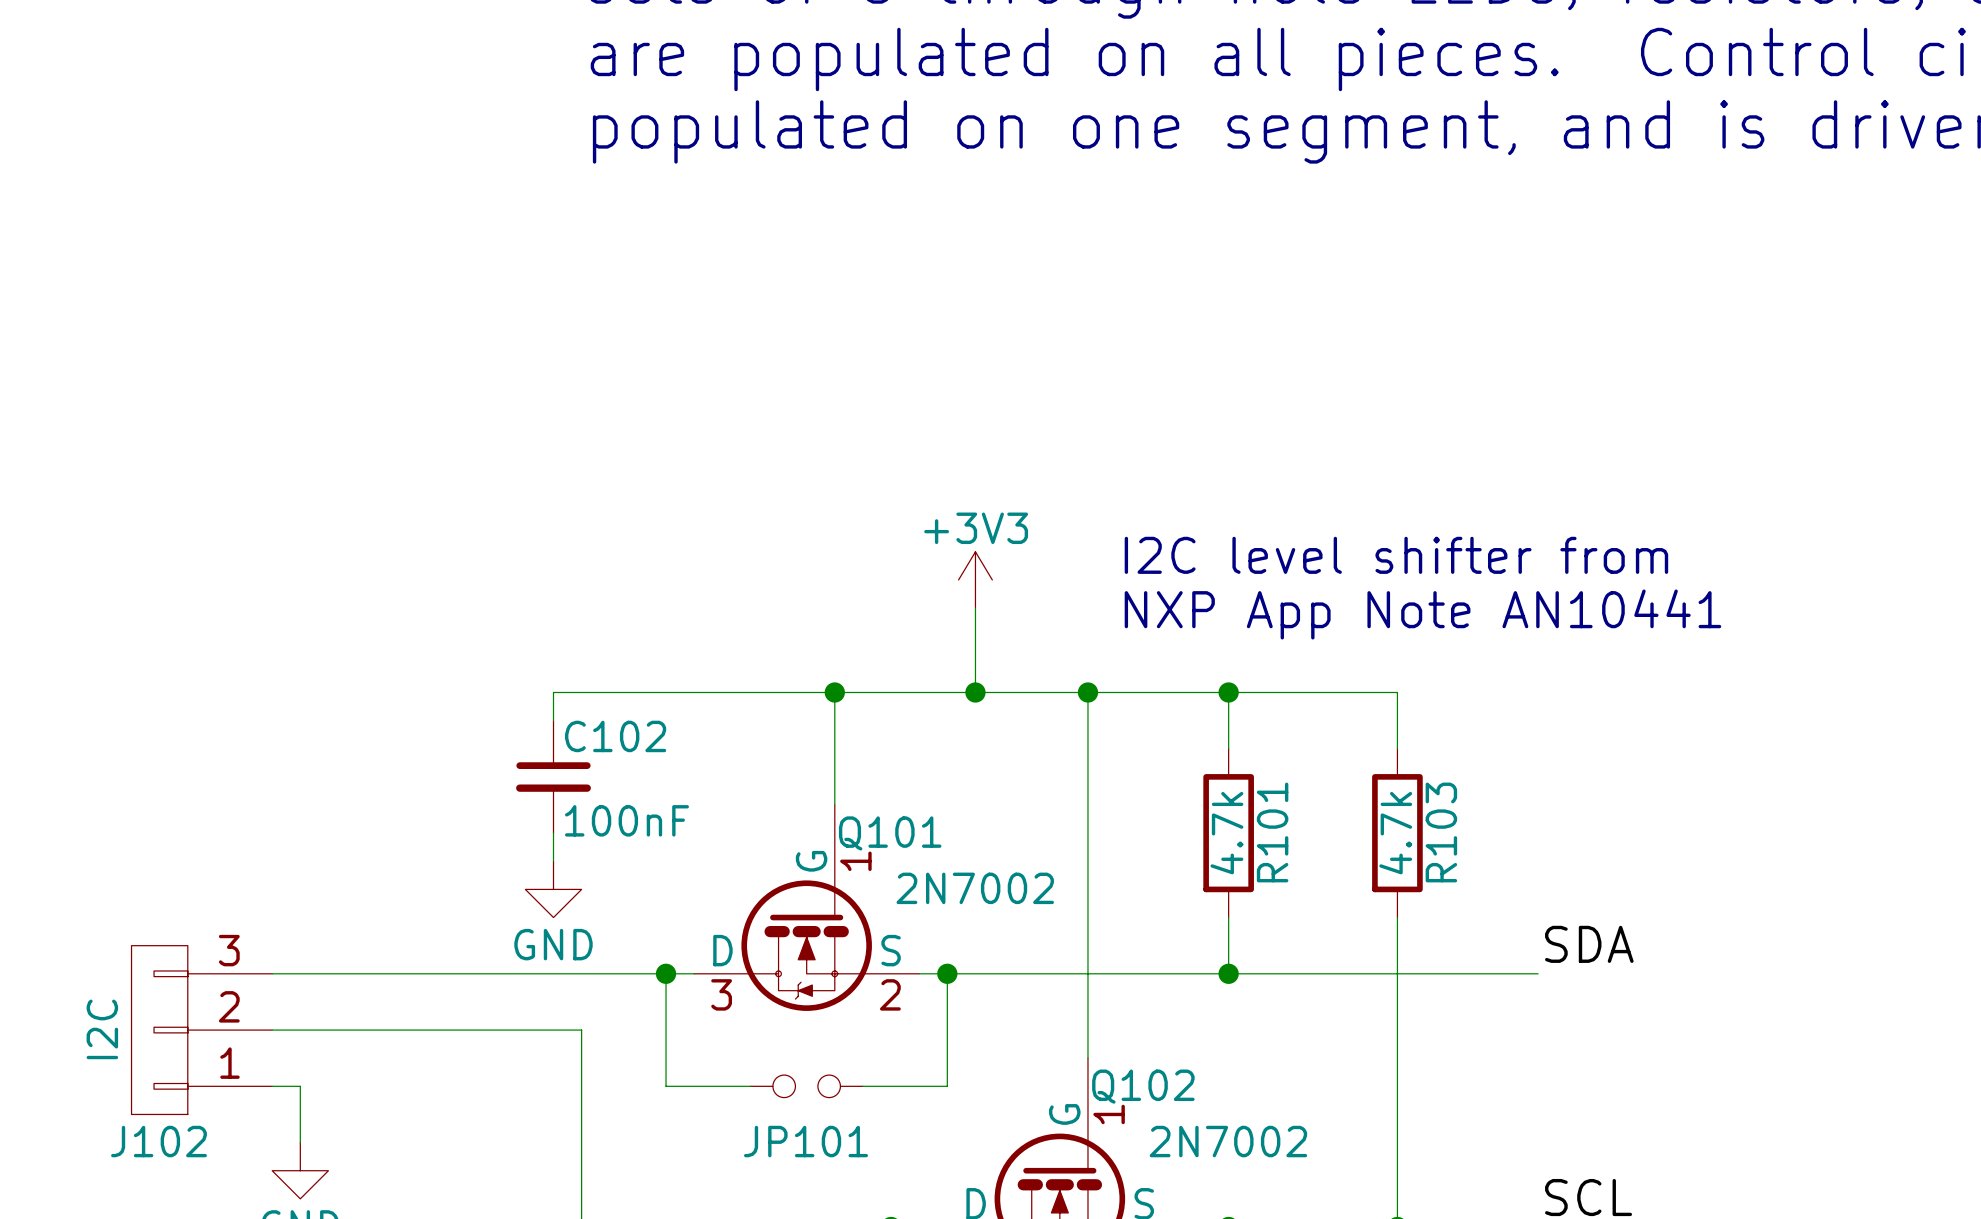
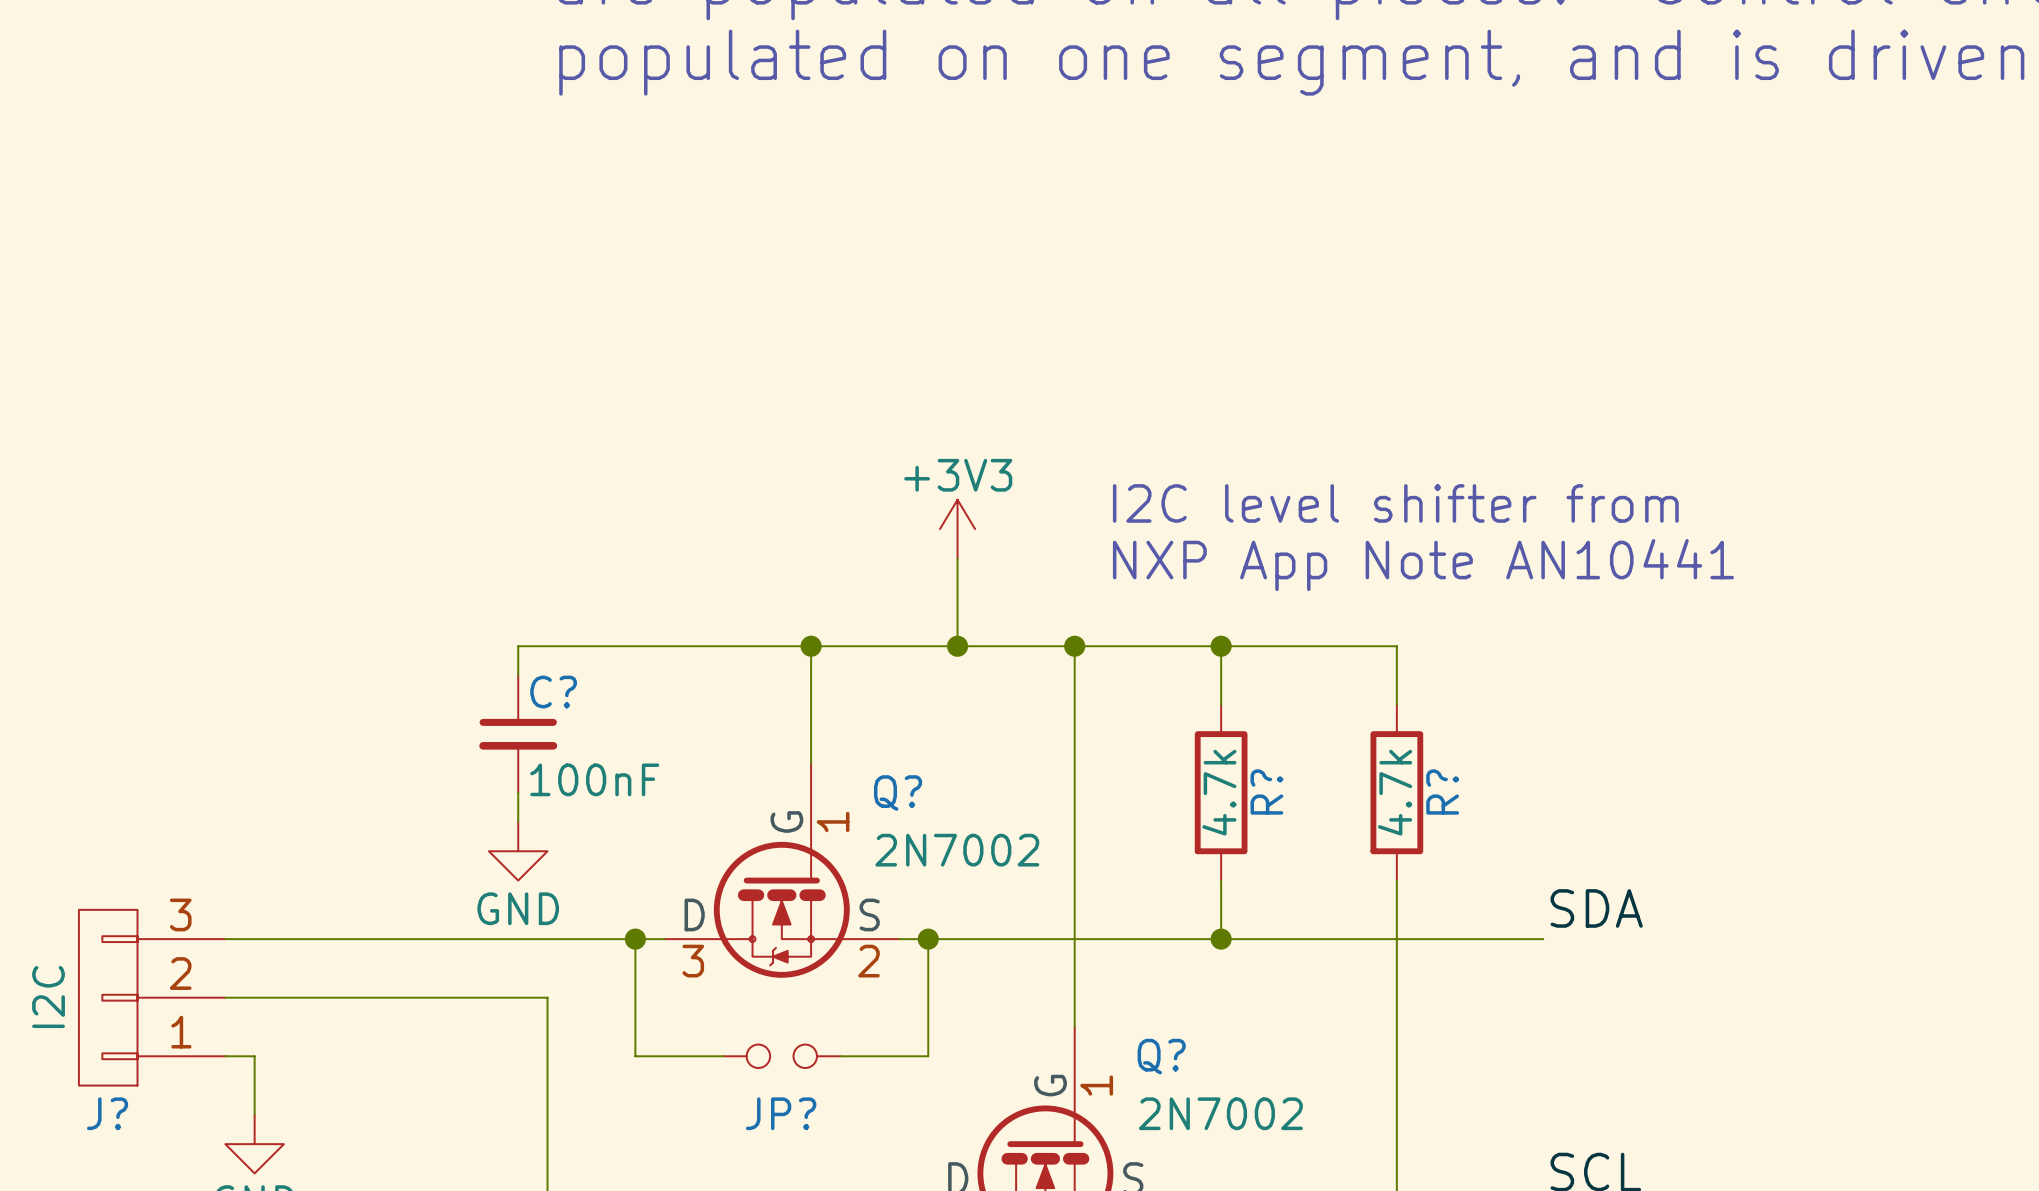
C102 name: C102 (615, 736) -> C? (553, 692)
R101 name: R101 (1272, 832) -> R? (1266, 791)
R103 name: R103 (1441, 832) -> R? (1442, 791)
Q101 name: Q101 (890, 833) -> Q? (898, 792)
Q102 name: Q102 (1143, 1086) -> Q? (1161, 1056)
J102 name: J102 (158, 1141) -> J? (107, 1113)
JP101 name: JP101 (806, 1141) -> JP? (781, 1113)

